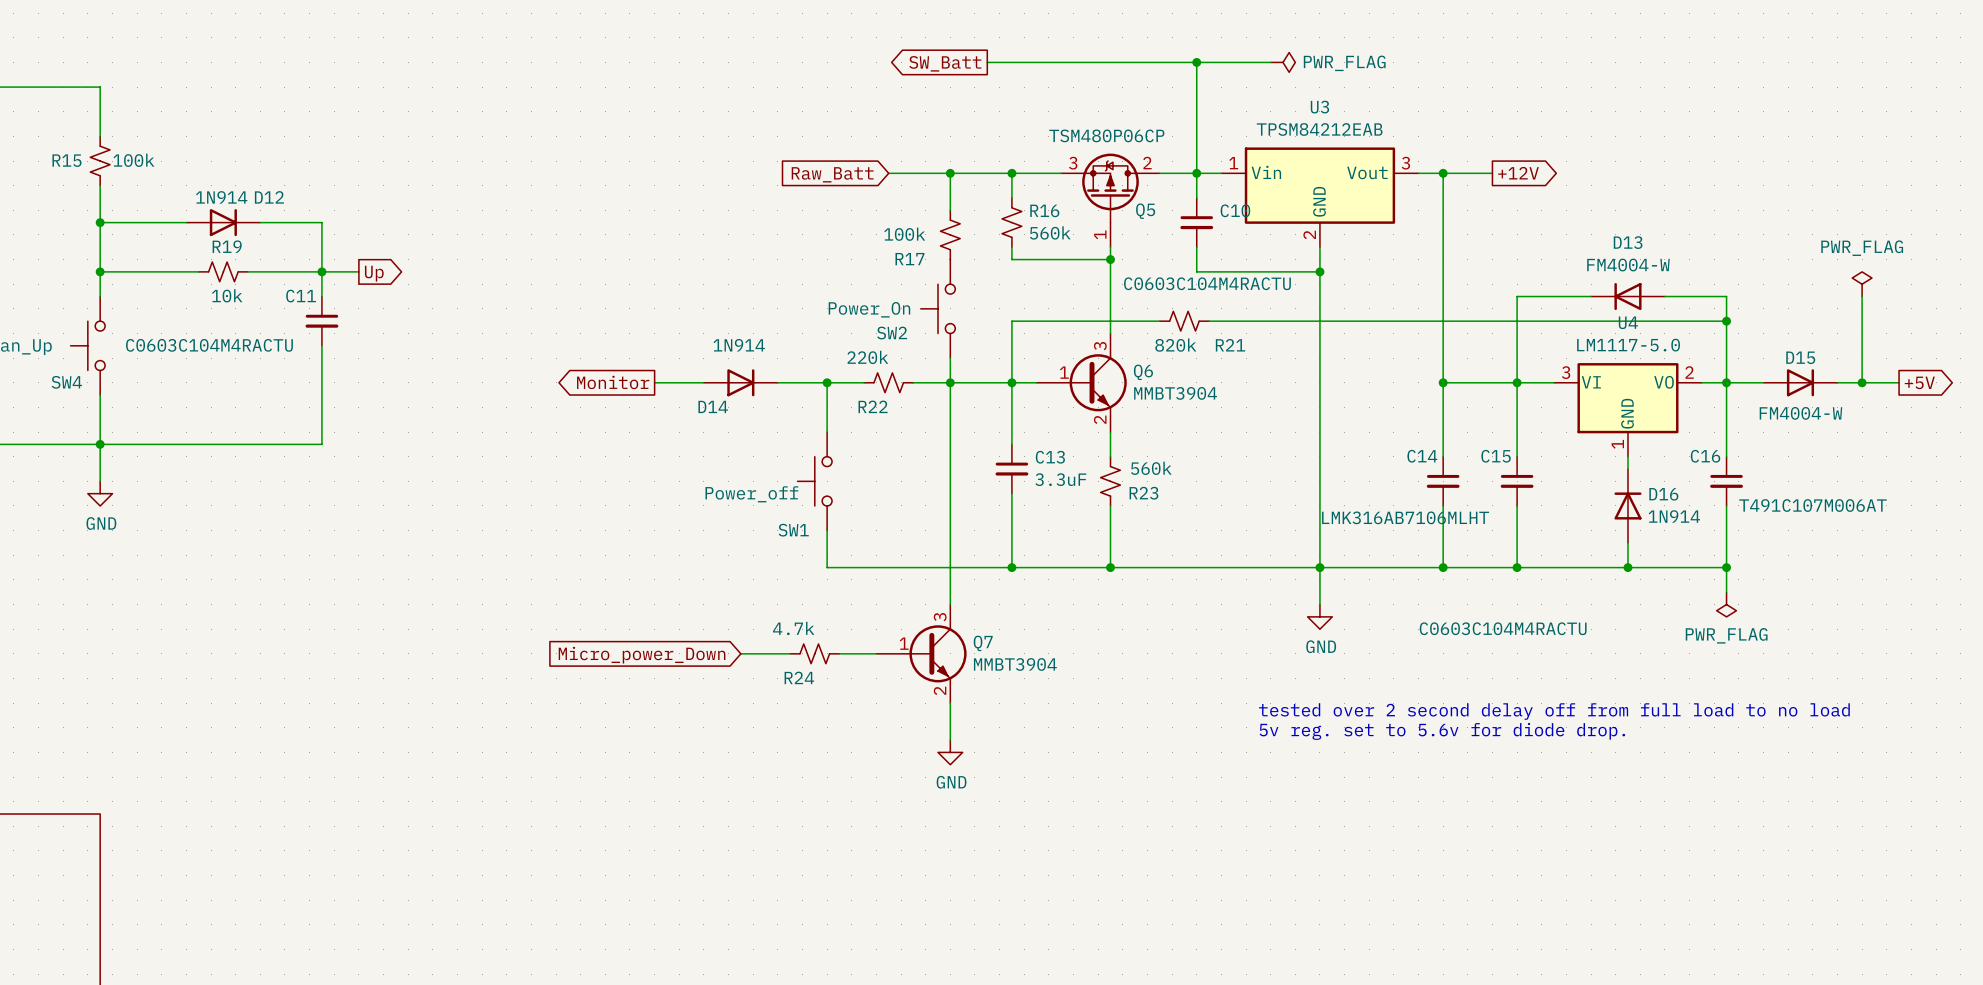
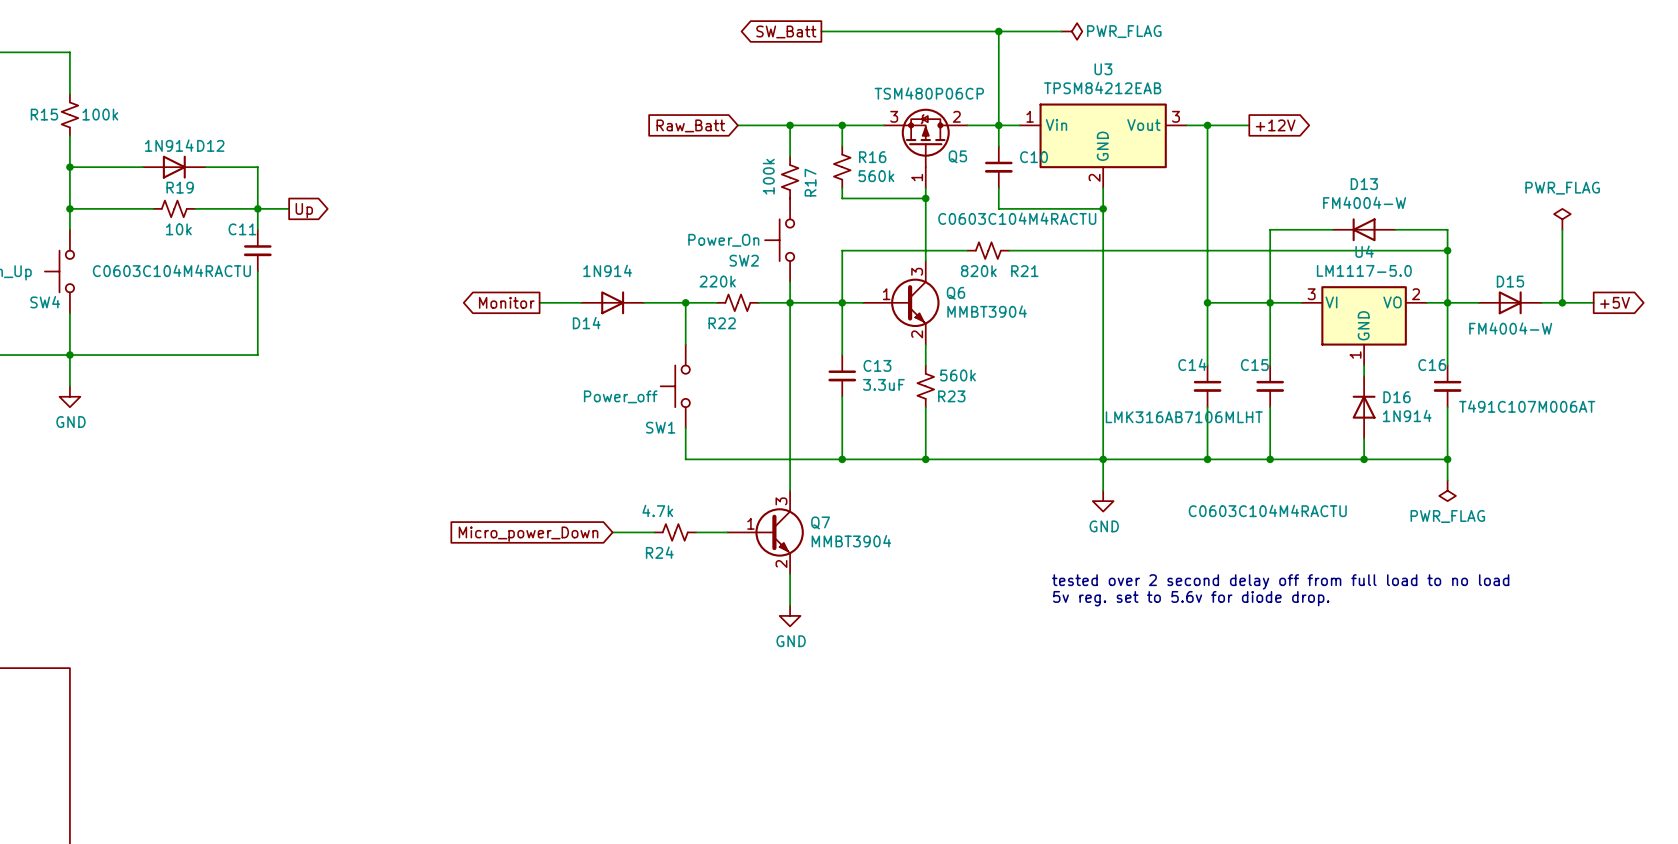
R17 value rotation: 0° (904, 234) -> 90° counterclockwise (768, 176)
R17 name rotation: 0° (909, 259) -> 90° counterclockwise (810, 182)
R17 name position: R17 (909, 259) -> R17 (810, 182)

